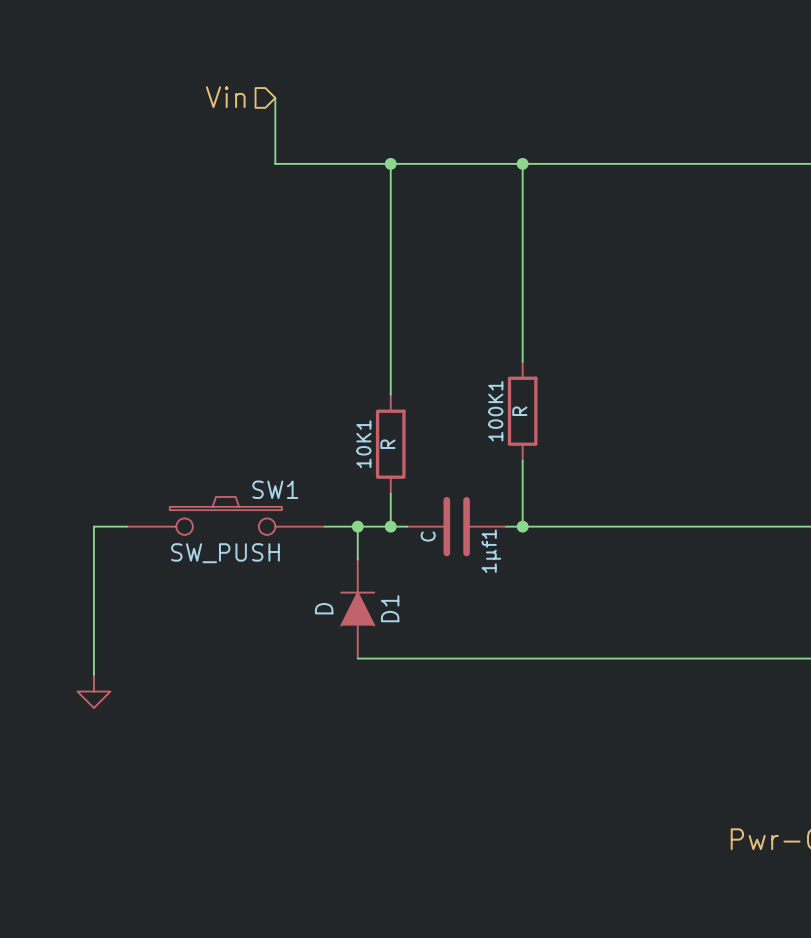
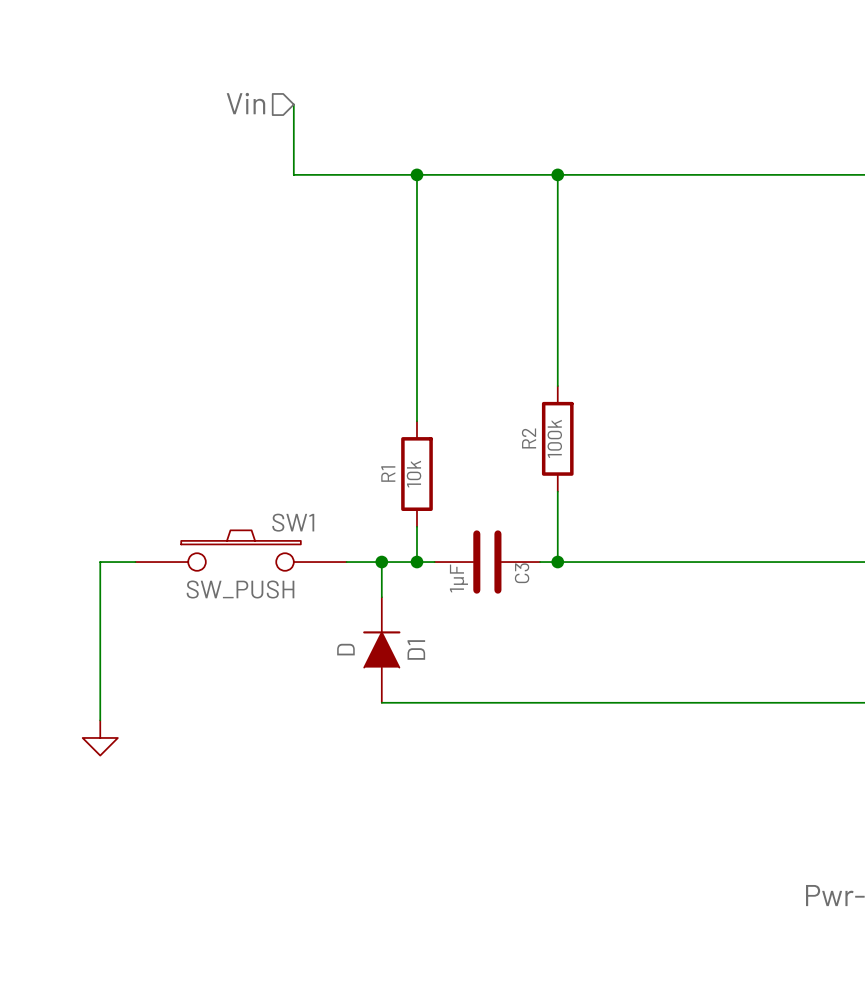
100K1 name: 100K1 (495, 411) -> R2 (529, 438)
100K1 value: R (519, 411) -> 100k (554, 438)
10K1 name: 10K1 (363, 444) -> R1 (388, 474)
10K1 value: R (387, 444) -> 10k (414, 474)
1µf1 value: C (428, 536) -> 1µF (458, 578)
1µf1 name: 1µf1 (491, 551) -> C3 (522, 573)

